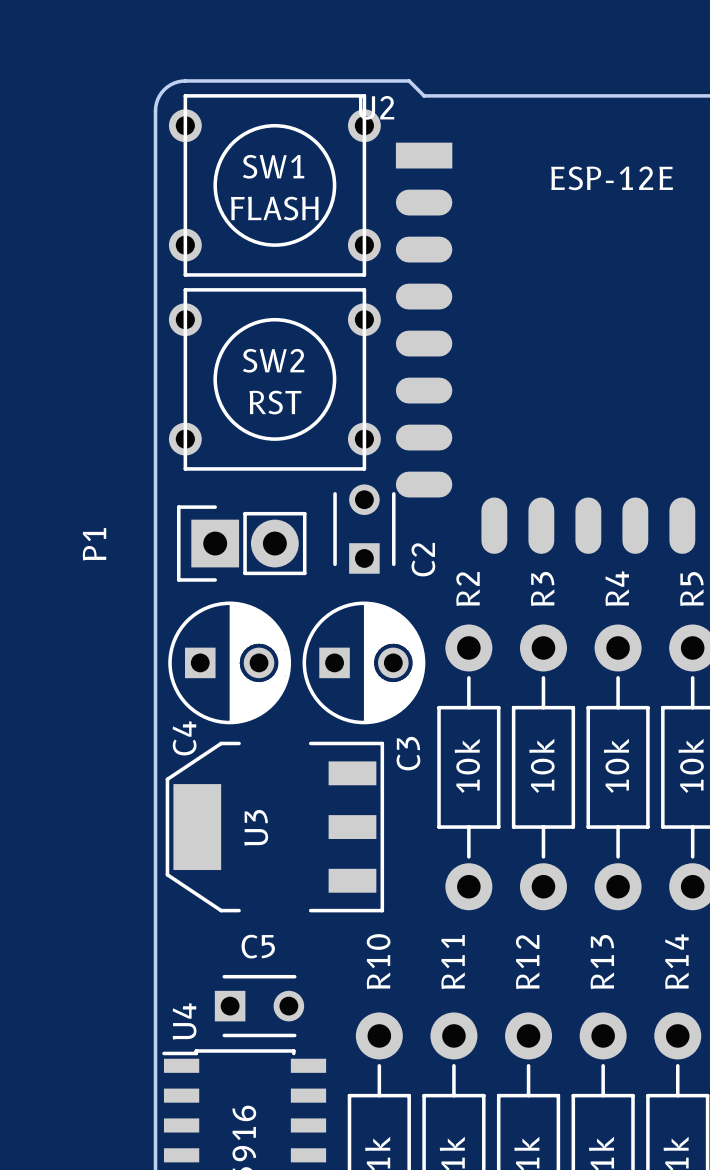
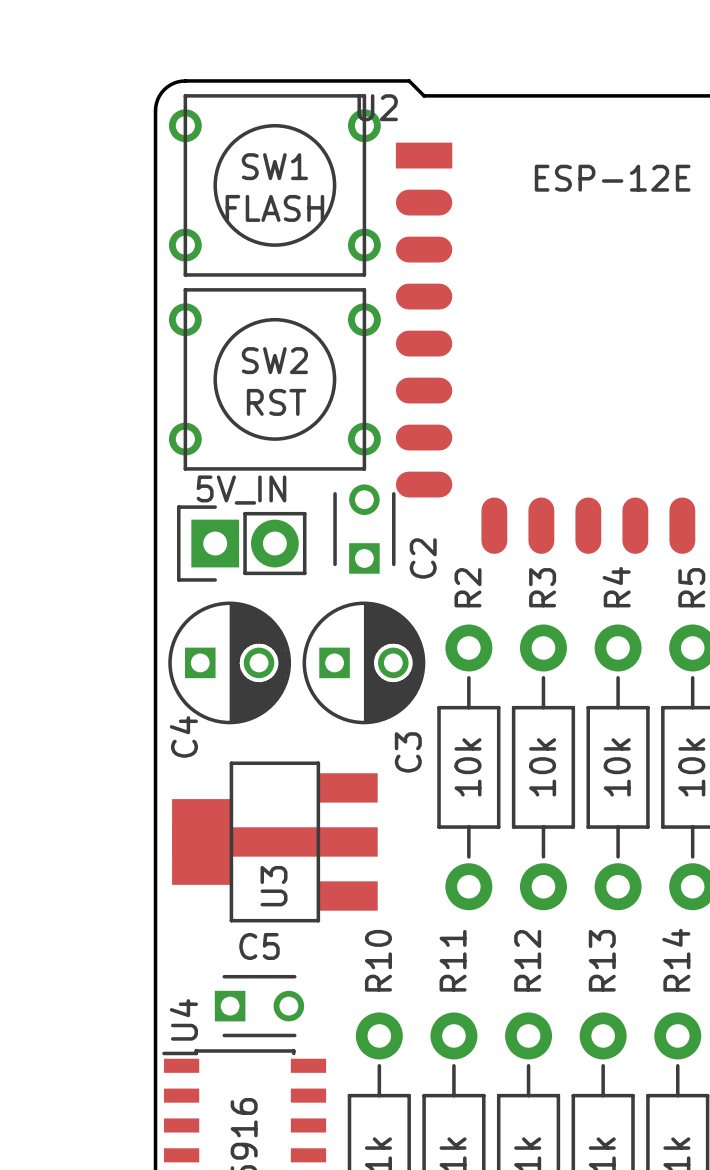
P1 value: none -> 5V_IN (241, 490)
P1 name: P1 (94, 544) -> none
U3 footprint: [165, 741, 385, 913] -> [172, 761, 378, 923]
U3 name position: U3 (256, 827) -> U3 (274, 886)

